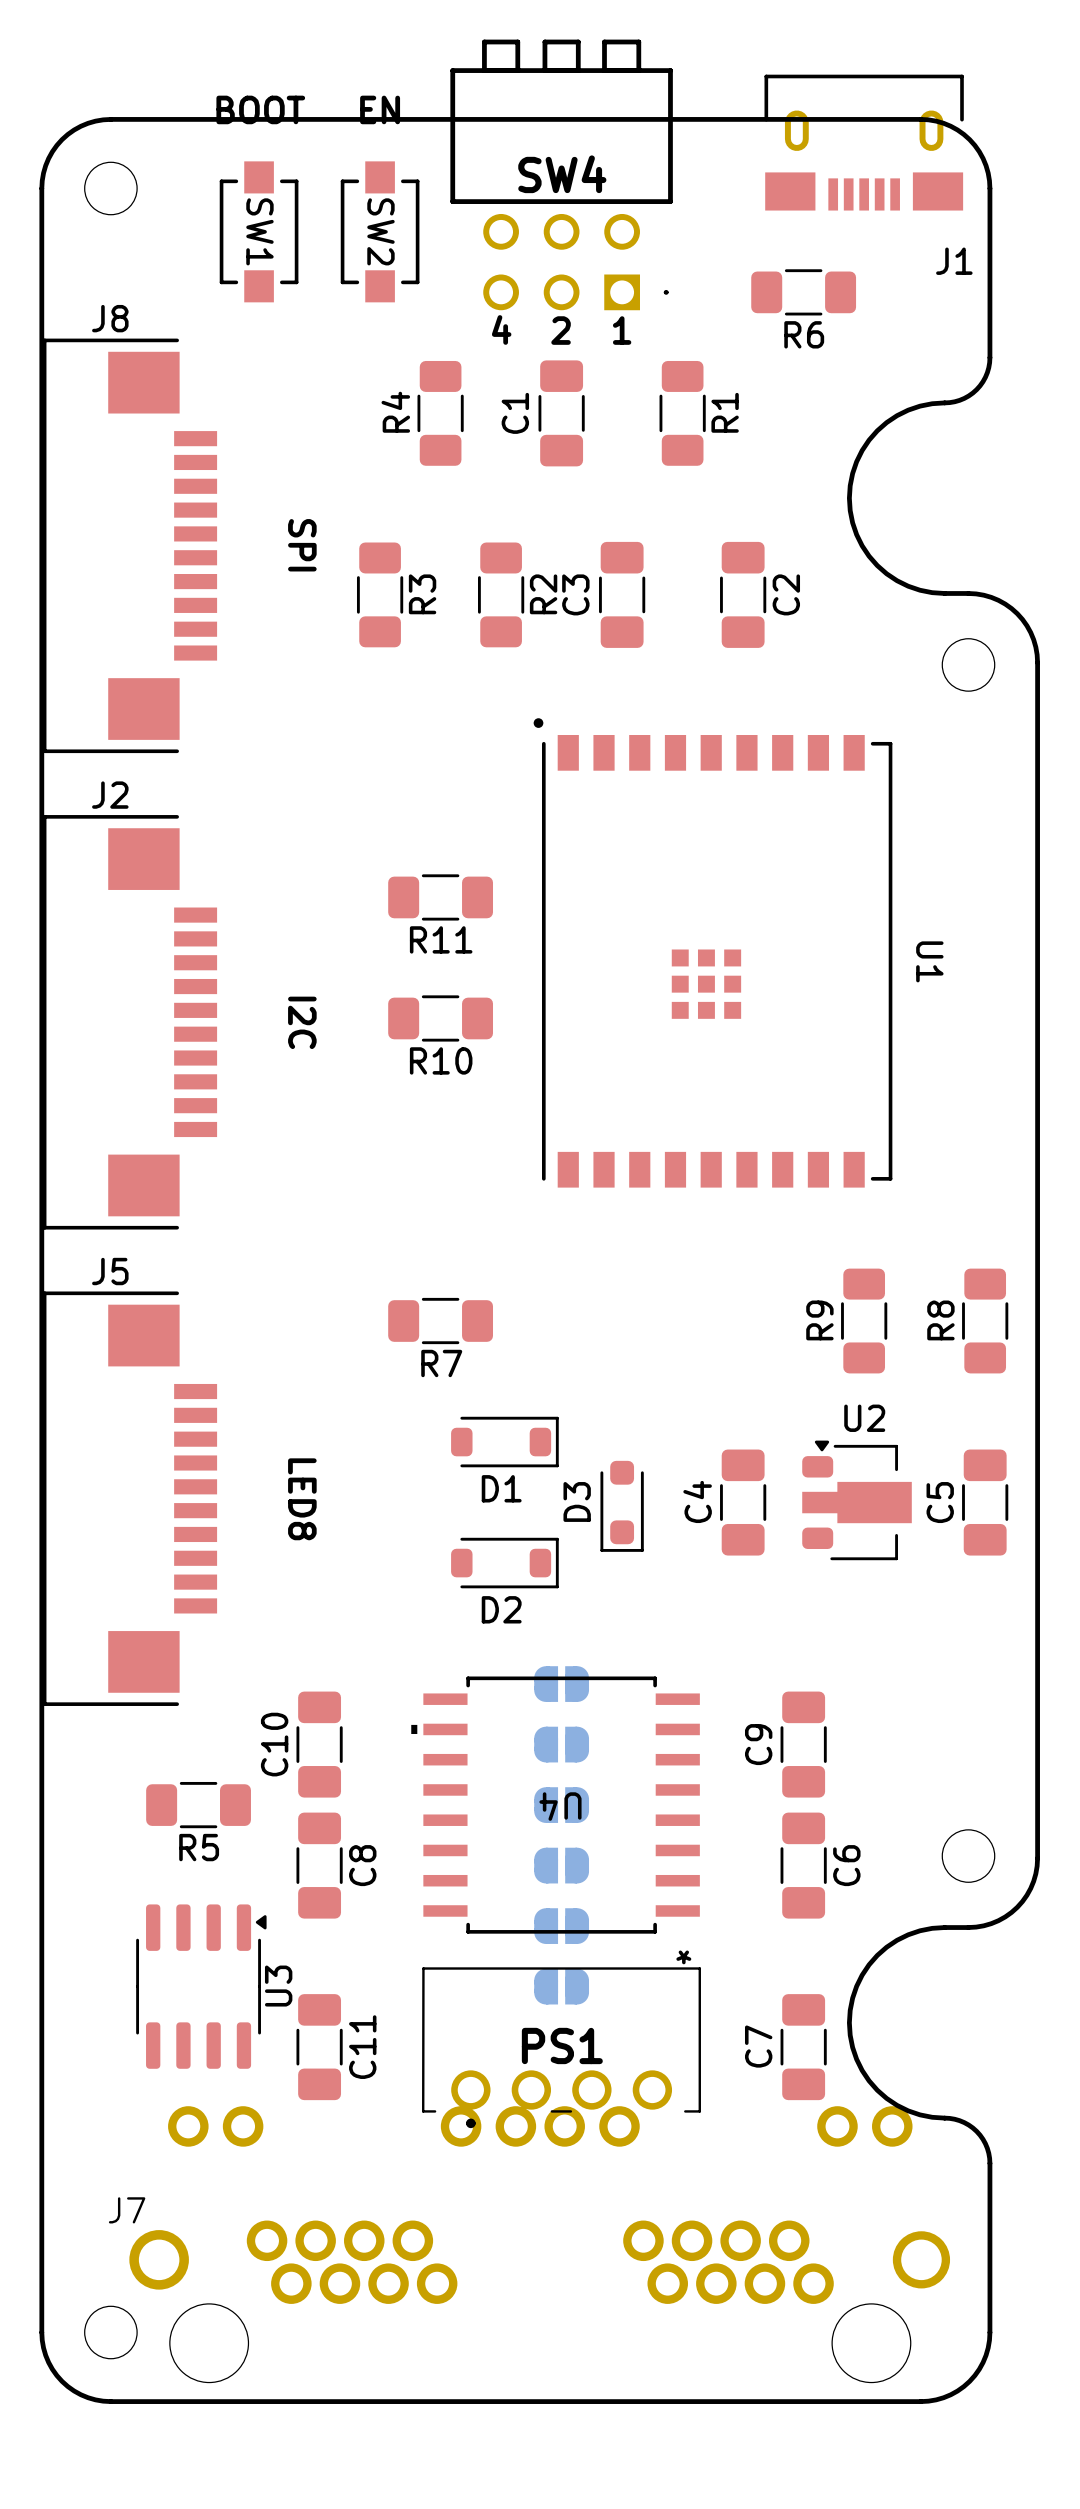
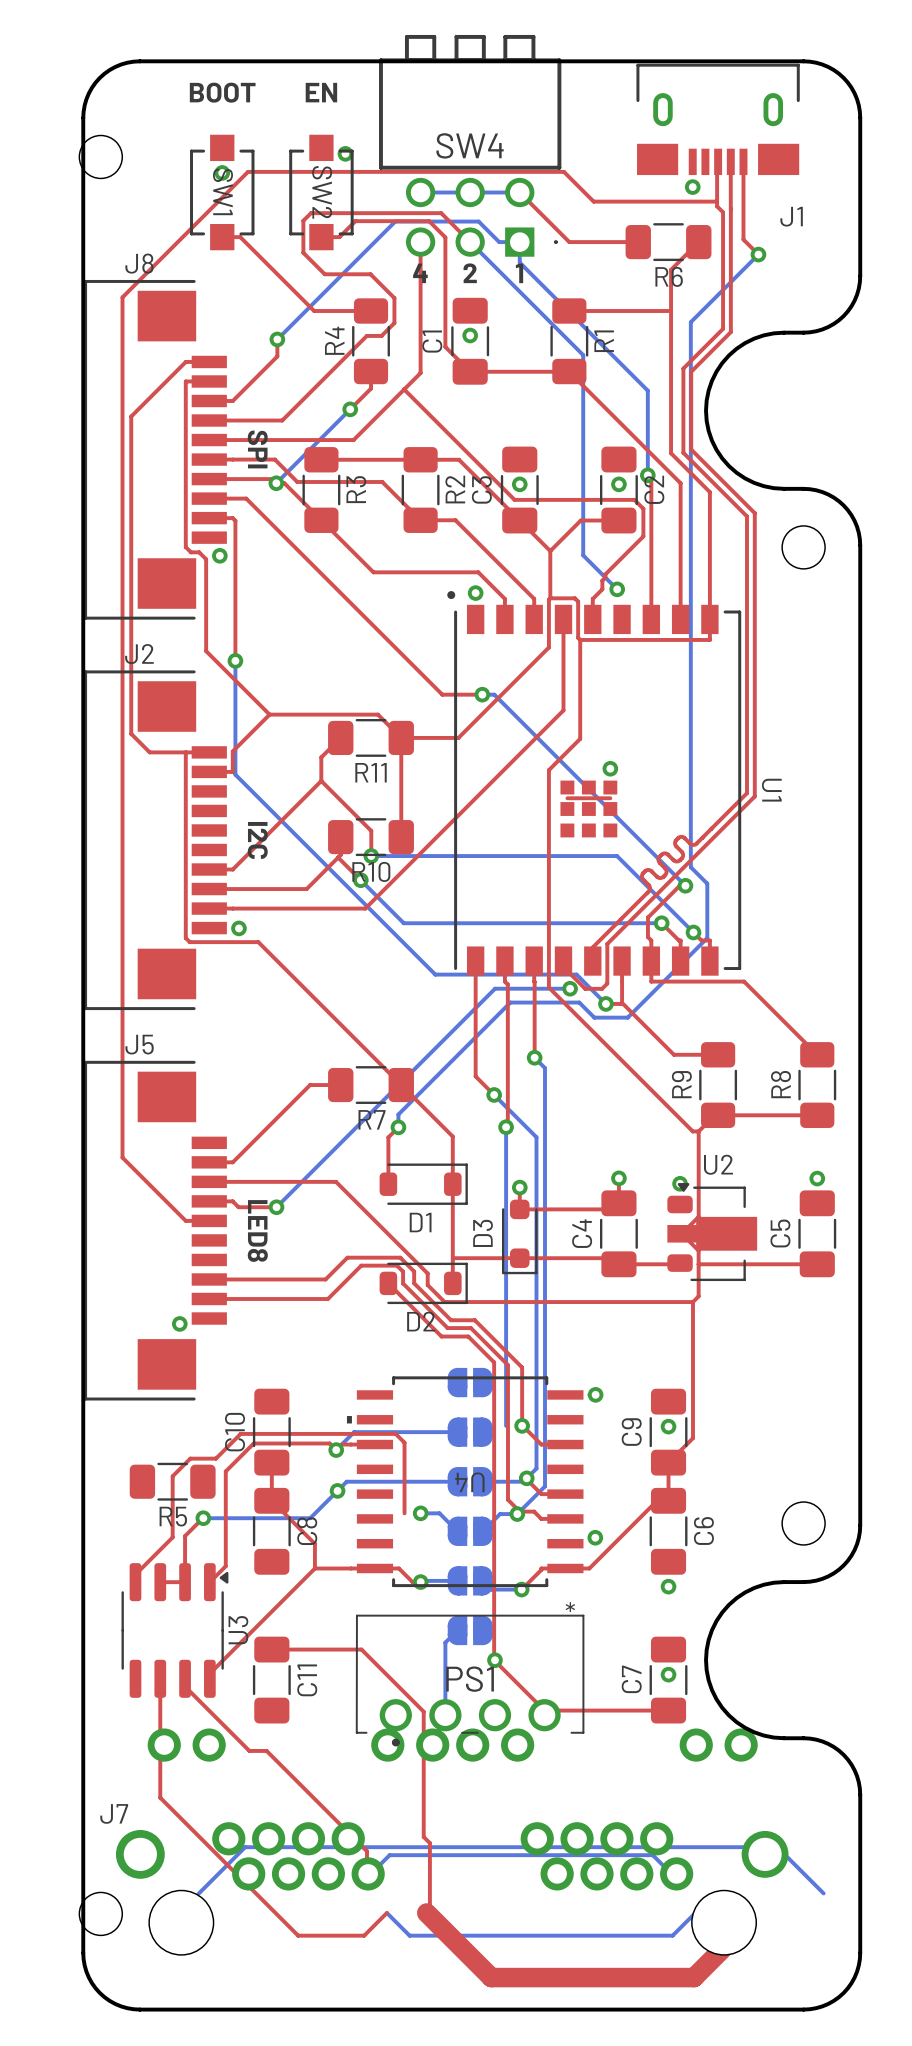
via: none -> (345, 153)
top track: none -> (718, 161) (717, 206) (723, 212) (723, 328) (683, 368) (683, 452) (746, 516) (746, 793) (695, 844) (691, 844) (682, 837) (678, 838) (675, 844) (682, 852) (682, 856) (676, 861) (666, 853) (659, 856) (658, 861) (666, 871) (663, 877) (658, 877) (649, 870) (643, 872) (642, 877) (649, 885) (649, 890) (592, 947) (592, 961)
top track: none -> (730, 161) (730, 332) (691, 371) (691, 449) (754, 513) (754, 796) (607, 943) (607, 983) (602, 988) (585, 988) (563, 967) (563, 961)
top track: none -> (743, 161) (743, 239) (758, 254)
via: none -> (222, 172)
via: none -> (692, 187)
bottom track: none -> (420, 192) (519, 192)
top track: none -> (519, 192) (569, 242) (638, 242)
top track: none -> (717, 201) (593, 201) (563, 171) (247, 171) (122, 297) (122, 1157) (185, 1220) (209, 1220)
top track: none -> (222, 237) (240, 237) (314, 311) (371, 311)
top track: none -> (321, 237) (339, 237) (355, 221) (429, 221) (445, 237) (445, 346) (470, 371) (569, 371) (680, 483) (680, 619)
top track: none -> (420, 242) (420, 373) (353, 440) (209, 440)
top track: none -> (470, 242) (441, 213) (310, 213) (303, 220) (303, 252) (324, 274) (370, 274) (394, 298) (394, 323) (381, 335) (366, 335) (282, 420) (209, 420)
bottom track: none -> (470, 242) (583, 355) (583, 555) (617, 589)
top track: none -> (698, 242) (671, 269) (671, 453) (709, 492) (709, 639) (580, 639)
bottom track: none -> (758, 254) (690, 322) (690, 867) (707, 883) (707, 938) (627, 1017) (594, 1017) (579, 1002) (510, 1002) (398, 1114) (398, 1127)
via: none -> (758, 254)
top track: none -> (569, 311) (671, 311)
board edge: (944, 402) (959, 400) (972, 393) (983, 381) (988, 367) (989, 188) (986, 165) (974, 145) (957, 130) (936, 121) (920, 119) (110, 119) (95, 121) (74, 130) (62, 139) (48, 158) (43, 173) (41, 188) (41, 2332) (43, 2347) (48, 2362) (62, 2381) (80, 2394) (103, 2401) (920, 2401) (936, 2399) (957, 2391) (974, 2375) (986, 2355) (989, 2332) (988, 2153) (983, 2139) (972, 2127) (959, 2120) (944, 2118) -> (784, 332) (816, 331) (833, 323) (851, 306) (859, 282) (858, 105) (851, 87) (843, 77) (822, 64) (803, 61) (139, 61) (121, 64) (109, 69) (99, 77) (88, 93) (83, 117) (83, 1952) (86, 1971) (91, 1983) (104, 1997) (121, 2006) (139, 2009) (803, 2009) (822, 2006) (838, 1997) (847, 1988) (858, 1965) (859, 1788) (851, 1764) (833, 1746) (816, 1739) (784, 1738)
via: none -> (470, 335)
top track: none -> (277, 339) (277, 356) (232, 401) (209, 401)
bottom track: none -> (277, 339) (395, 221) (478, 221) (499, 242) (519, 242) (519, 262) (647, 390) (647, 475)
via: none -> (277, 339)
top track: none -> (209, 361) (185, 361) (131, 416) (131, 733) (149, 752) (209, 752)
top track: none -> (371, 371) (371, 388) (350, 409)
top track: none -> (209, 381) (185, 381) (185, 547) (191, 552) (199, 552) (206, 559) (206, 651) (269, 714)
top track: none -> (404, 389) (514, 499) (634, 499) (643, 508) (643, 536) (605, 574) (602, 580) (602, 589) (592, 598) (592, 619)
bottom track: none -> (350, 409) (276, 483)
via: none -> (350, 409)
J8 position: (129, 545) -> (155, 449)
top track: none -> (209, 459) (274, 459) (297, 481) (382, 481) (420, 520) (455, 520) (534, 598) (534, 619)
top track: none -> (321, 459) (459, 459) (550, 551)
top track: none -> (647, 475) (651, 478) (651, 619)
via: none -> (647, 475)
top track: none -> (209, 479) (272, 479) (276, 483) (284, 483) (373, 572) (478, 572) (504, 598) (504, 619)
via: none -> (276, 483)
via: none -> (519, 484)
via: none -> (618, 484)
top track: none -> (209, 498) (246, 498) (442, 694) (482, 694)
top track: none -> (209, 518) (232, 518) (235, 520) (235, 660)
top track: none -> (618, 520) (580, 520) (550, 551)
top track: none -> (550, 551) (550, 598)
via: none -> (219, 555)
via: none -> (617, 589)
via: none -> (475, 593)
top track: none -> (550, 598) (548, 647) (458, 737) (401, 737)
top track: none -> (550, 598) (574, 598) (578, 601) (578, 637) (580, 639)
top track: none -> (563, 619) (563, 710) (365, 908) (209, 908)
top track: none -> (580, 639) (580, 738) (548, 770) (548, 987) (692, 1131) (698, 1131)
bottom track: none -> (235, 660) (235, 774) (435, 974) (576, 974) (605, 1003)
via: none -> (235, 660)
bottom track: none -> (482, 694) (494, 694) (685, 885)
via: none -> (482, 694)
top track: none -> (269, 714) (232, 751) (232, 771) (209, 771)
top track: none -> (269, 714) (377, 714) (401, 737)
top track: none -> (340, 737) (321, 757) (321, 780)
top track: none -> (401, 737) (401, 837)
top track: none -> (185, 752) (185, 938) (189, 942) (258, 942) (452, 1136) (452, 1283)
via: none -> (610, 768)
top track: none -> (321, 780) (232, 869) (209, 869)
top track: none -> (321, 780) (371, 830) (371, 856)
top track: none -> (567, 798) (610, 798)
top track: none -> (340, 837) (340, 854) (306, 889) (209, 889)
J2 position: (129, 1022) -> (155, 840)
bottom track: none -> (371, 856) (617, 856) (693, 932)
via: none -> (371, 856)
top track: none -> (338, 857) (360, 880)
bottom track: none -> (360, 880) (403, 923) (661, 923)
via: none -> (360, 880)
top track: none -> (685, 885) (679, 885) (647, 917) (647, 937) (651, 940) (651, 981) (744, 981) (817, 1054)
via: none -> (685, 885)
top track: none -> (661, 923) (680, 940) (680, 961)
via: none -> (661, 923)
via: none -> (238, 928)
top track: none -> (693, 932) (701, 940) (709, 940) (709, 961)
via: none -> (693, 932)
top track: none -> (475, 961) (475, 1076) (494, 1094)
top track: none -> (504, 961) (504, 981) (507, 984) (507, 1125) (506, 1127)
top track: none -> (534, 961) (534, 1057)
top track: none -> (622, 961) (622, 1002)
bottom track: none -> (570, 988) (495, 988) (276, 1207)
via: none -> (570, 988)
top track: none -> (622, 1002) (605, 1003)
top track: none -> (622, 1002) (673, 1054) (718, 1054)
via: none -> (605, 1003)
bottom track: none -> (534, 1057) (544, 1068) (544, 1486) (517, 1514) (500, 1514) (482, 1531)
via: none -> (534, 1057)
top track: none -> (340, 1085) (310, 1085) (232, 1162) (209, 1162)
bottom track: none -> (494, 1094) (536, 1137) (536, 1468) (523, 1481) (482, 1481)
via: none -> (494, 1094)
top track: none -> (817, 1115) (714, 1115) (698, 1131)
top track: none -> (398, 1127) (388, 1137) (388, 1184)
via: none -> (398, 1127)
bottom track: none -> (506, 1127) (506, 1425)
via: none -> (506, 1127)
top track: none -> (698, 1131) (698, 1216) (681, 1233) (698, 1250) (698, 1296) (692, 1302)
top track: none -> (618, 1178) (618, 1203) (612, 1209) (519, 1209) (519, 1187)
via: none -> (618, 1178)
via: none -> (817, 1178)
top track: none -> (209, 1181) (336, 1181) (427, 1273) (427, 1285) (444, 1302) (692, 1302)
via: none -> (680, 1183)
via: none -> (519, 1187)
top track: none -> (209, 1201) (232, 1201) (238, 1207) (276, 1207)
via: none -> (276, 1207)
J5 position: (129, 1498) -> (155, 1230)
top track: none -> (452, 1258) (612, 1258) (618, 1264) (680, 1263)
top track: none -> (698, 1264) (817, 1264)
top track: none -> (209, 1279) (325, 1279) (347, 1257) (400, 1257) (414, 1271) (414, 1283) (451, 1320) (474, 1320) (522, 1367) (522, 1425) (541, 1444) (565, 1444)
top track: none -> (388, 1283) (441, 1336) (468, 1336) (494, 1362) (494, 1660) (544, 1710)
top track: none -> (209, 1299) (327, 1299) (361, 1265) (397, 1265) (403, 1271) (403, 1283) (447, 1328) (470, 1328) (507, 1365) (507, 1499) (519, 1511)
top track: none -> (692, 1302) (692, 1438) (668, 1462) (668, 1500) (657, 1500) (589, 1568) (541, 1568) (521, 1589)
via: none -> (179, 1323)
via: none -> (595, 1394)
via: none -> (522, 1425)
via: none -> (668, 1426)
bottom track: none -> (457, 1432) (354, 1432) (336, 1450)
top track: none -> (374, 1444) (341, 1444) (336, 1450) (329, 1443) (253, 1443) (225, 1471) (225, 1566) (209, 1582)
via: none -> (336, 1450)
top track: none -> (271, 1462) (271, 1500) (314, 1543) (314, 1568)
top track: none -> (526, 1478) (541, 1494) (565, 1494)
via: none -> (526, 1478)
bottom track: none -> (457, 1481) (346, 1481) (310, 1518) (203, 1518)
via: none -> (337, 1490)
top track: none -> (519, 1511) (534, 1511) (541, 1518) (565, 1518)
top track: none -> (404, 1513) (404, 1442) (395, 1433) (240, 1433) (215, 1458) (190, 1458) (172, 1476) (172, 1537) (135, 1574) (135, 1582)
bottom track: none -> (420, 1513) (439, 1513) (457, 1531)
via: none -> (420, 1513)
via: none -> (517, 1514)
top track: none -> (203, 1518) (185, 1536) (185, 1582) (160, 1582)
via: none -> (203, 1518)
via: none -> (595, 1537)
top track: none -> (314, 1568) (398, 1568) (412, 1582) (420, 1582)
top track: none -> (314, 1568) (209, 1673) (209, 1678)
bottom track: none -> (457, 1580) (420, 1582)
bottom track: none -> (482, 1580) (491, 1589) (521, 1589)
via: none -> (420, 1582)
via: none -> (668, 1586)
via: none -> (521, 1589)
bottom track: none -> (457, 1630) (445, 1642) (445, 1715)
top track: none -> (271, 1649) (361, 1649) (423, 1711) (423, 1836) (429, 1843) (429, 1909) (426, 1912) (491, 1977) (694, 1977) (735, 1936) (735, 1912)
via: none -> (494, 1660)
via: none -> (668, 1674)
top track: none -> (160, 1678) (160, 1797) (298, 1935) (364, 1935) (386, 1912)
top track: none -> (185, 1678) (185, 1686) (249, 1750) (266, 1750) (367, 1851) (367, 1877)
top track: none -> (544, 1710) (668, 1710)
bottom track: none -> (367, 1877) (389, 1855) (652, 1855) (675, 1877)
bottom track: none -> (198, 1893) (245, 1847) (777, 1847) (823, 1893)
bottom track: none -> (386, 1912) (409, 1935) (672, 1935) (695, 1912)

